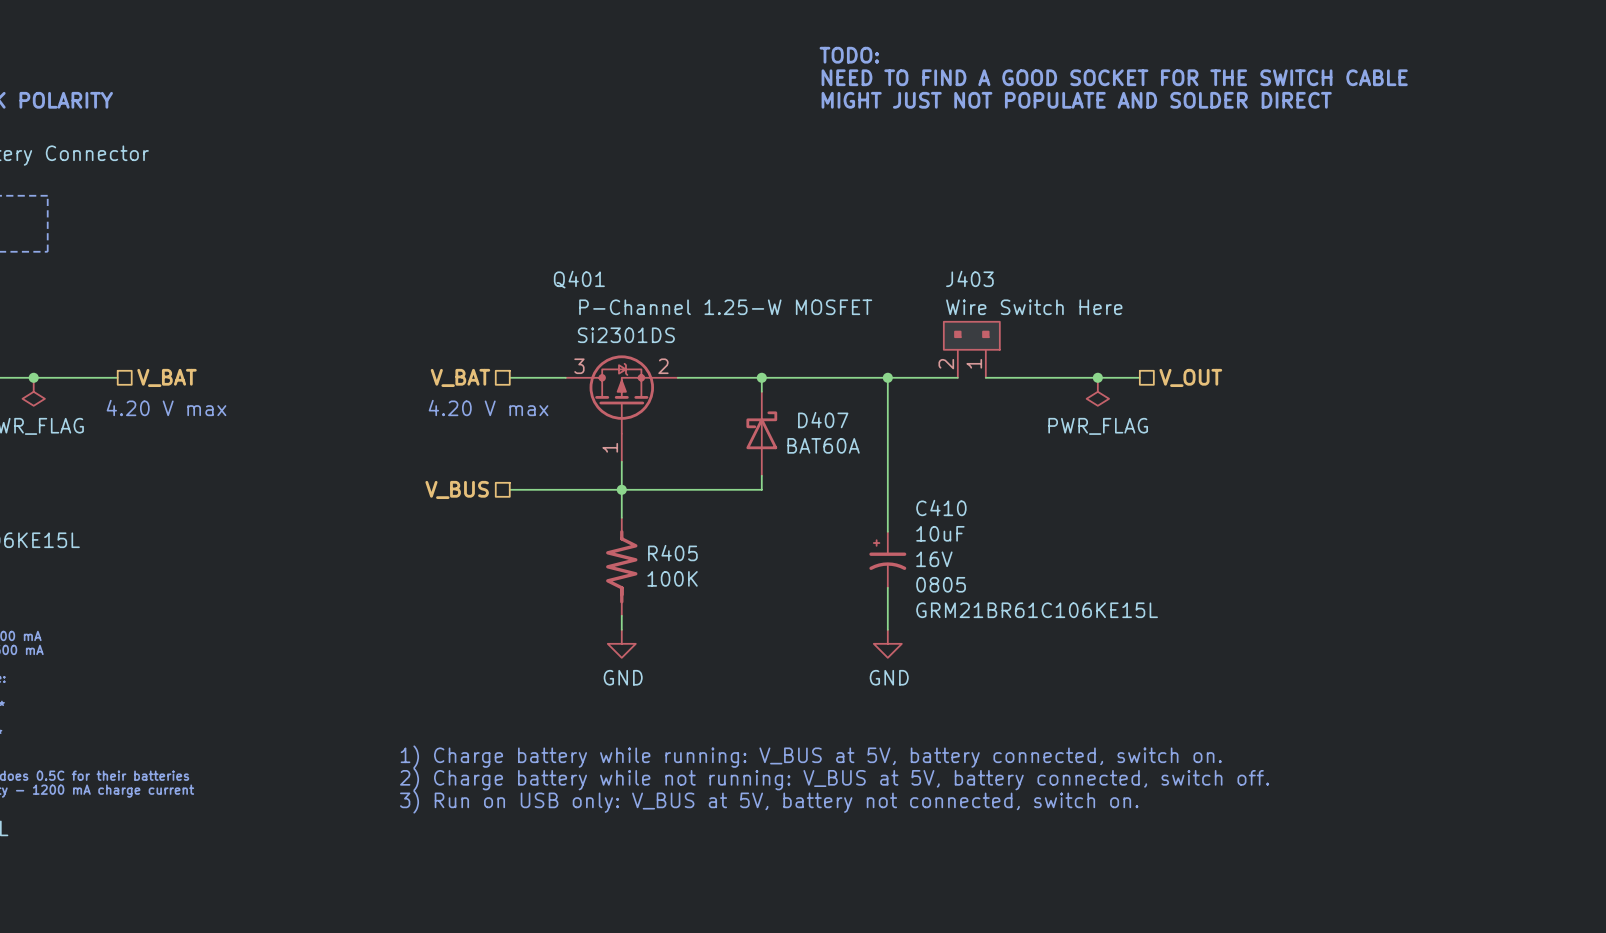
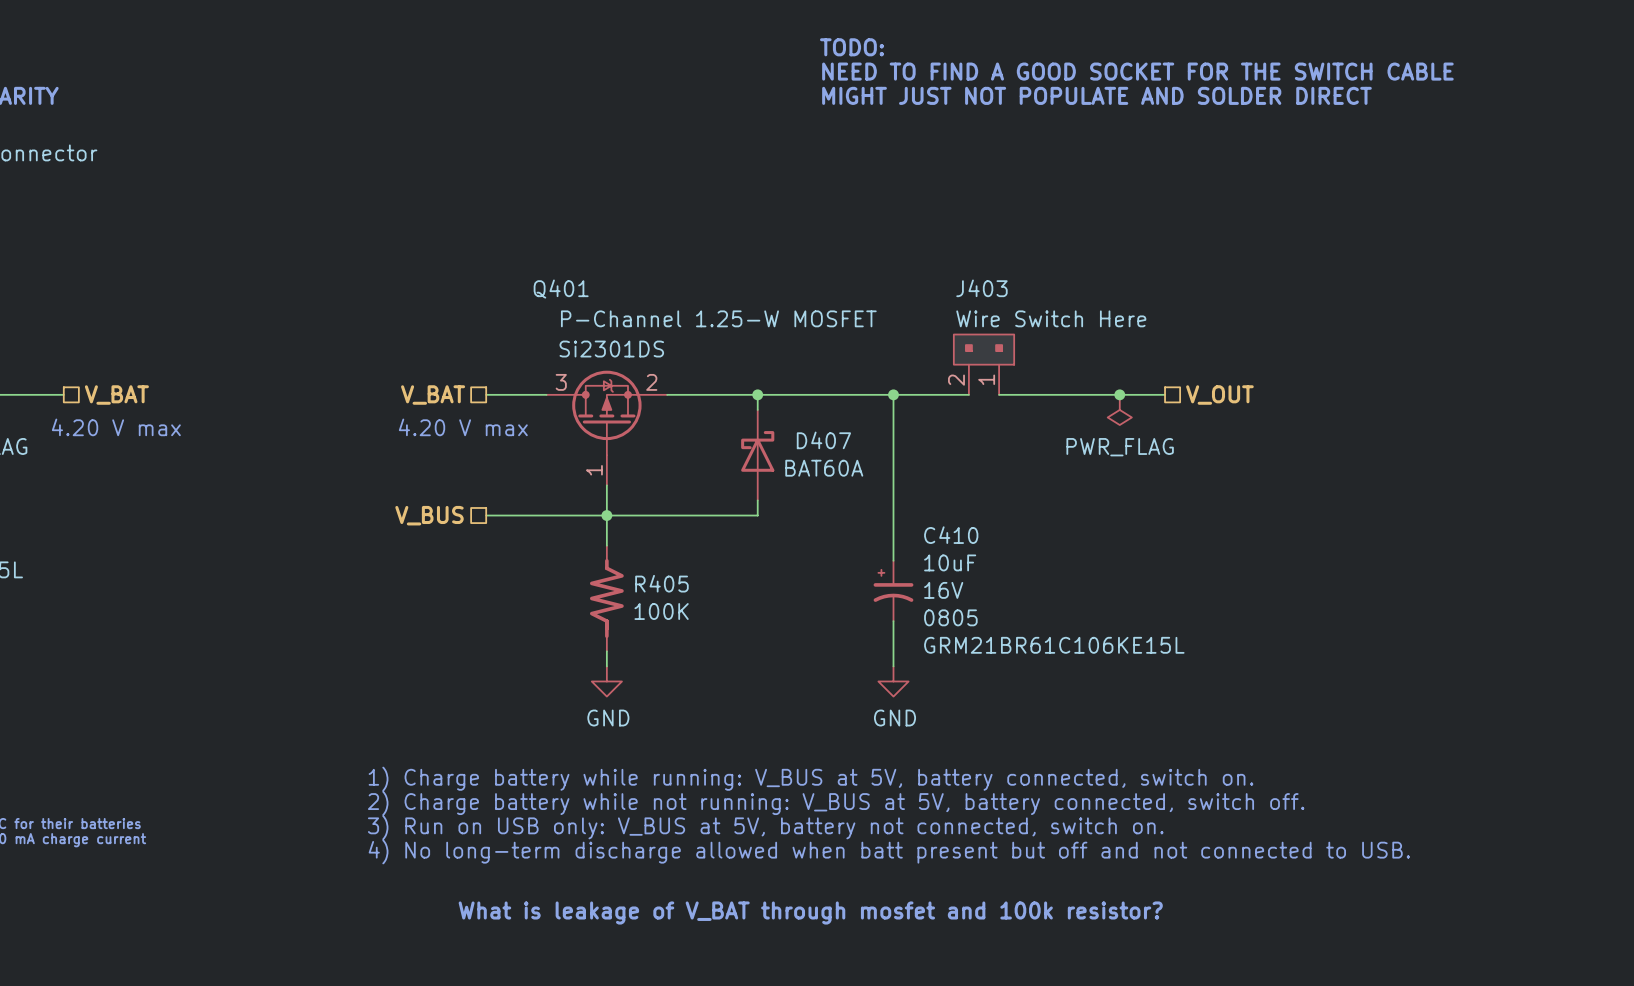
text: none -> 1) Charge battery while running: V_BUS at 5V, battery connected, switch on. (810, 779)
text: 1) Charge battery while running: V_BUS at 5V, battery connected, switch on. (811, 756) -> 2) Charge battery while not running: V_BUS at 5V, battery connected, switch off. (836, 803)
text: 2) Charge battery while not running: V_BUS at 5V, battery connected, switch off. (834, 779) -> 3) Run on USB only: V_BUS at 5V, battery not connected, switch on. (765, 827)
text: 3) Run on USB only: V_BUS at 5V, battery not connected, switch on. (769, 802) -> 4) No long-term discharge allowed when batt present but off and not connected to USB. (889, 851)
text: none -> What is leakage of V_BAT through mosfet and 100k resistor? (810, 912)

